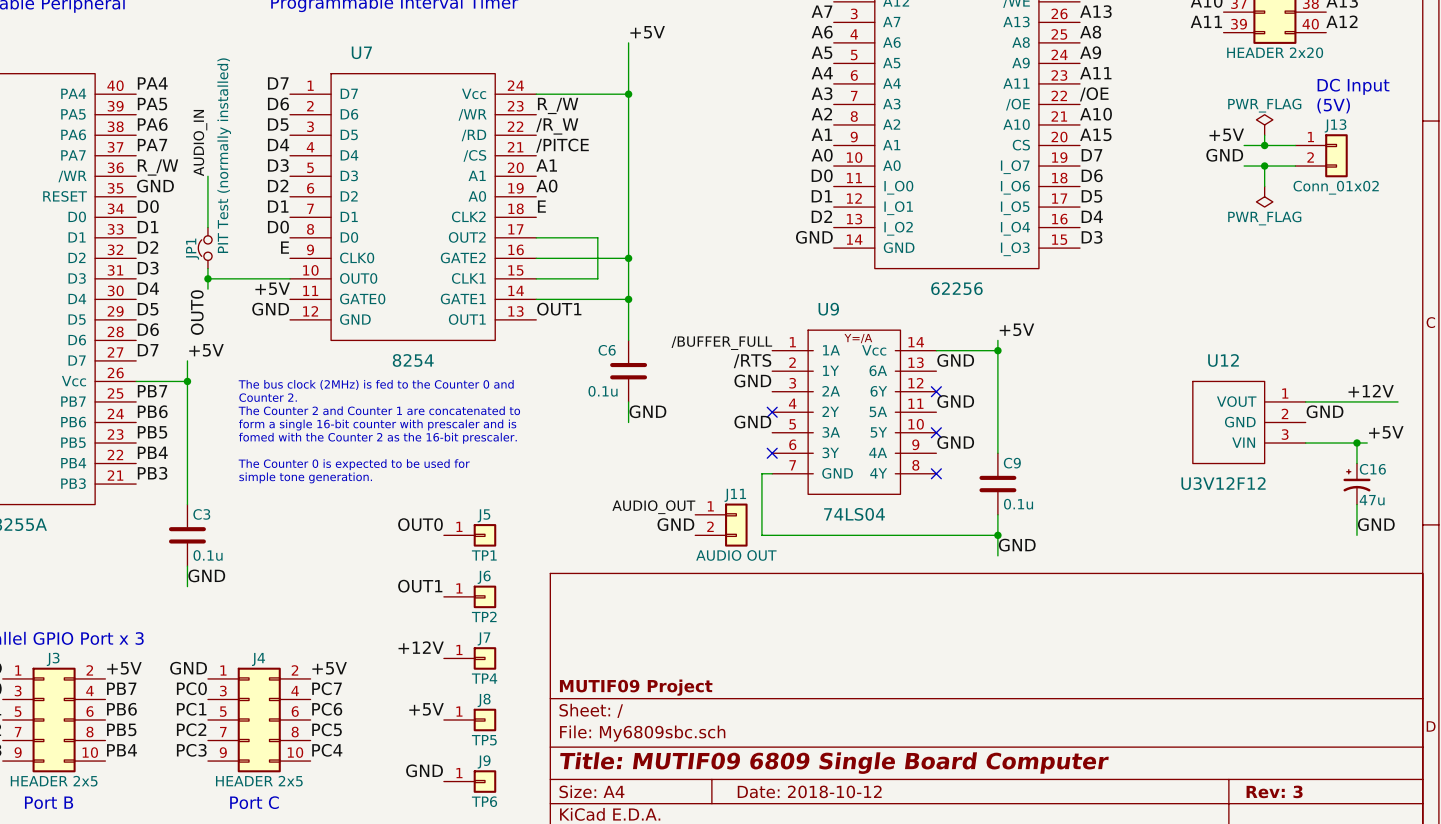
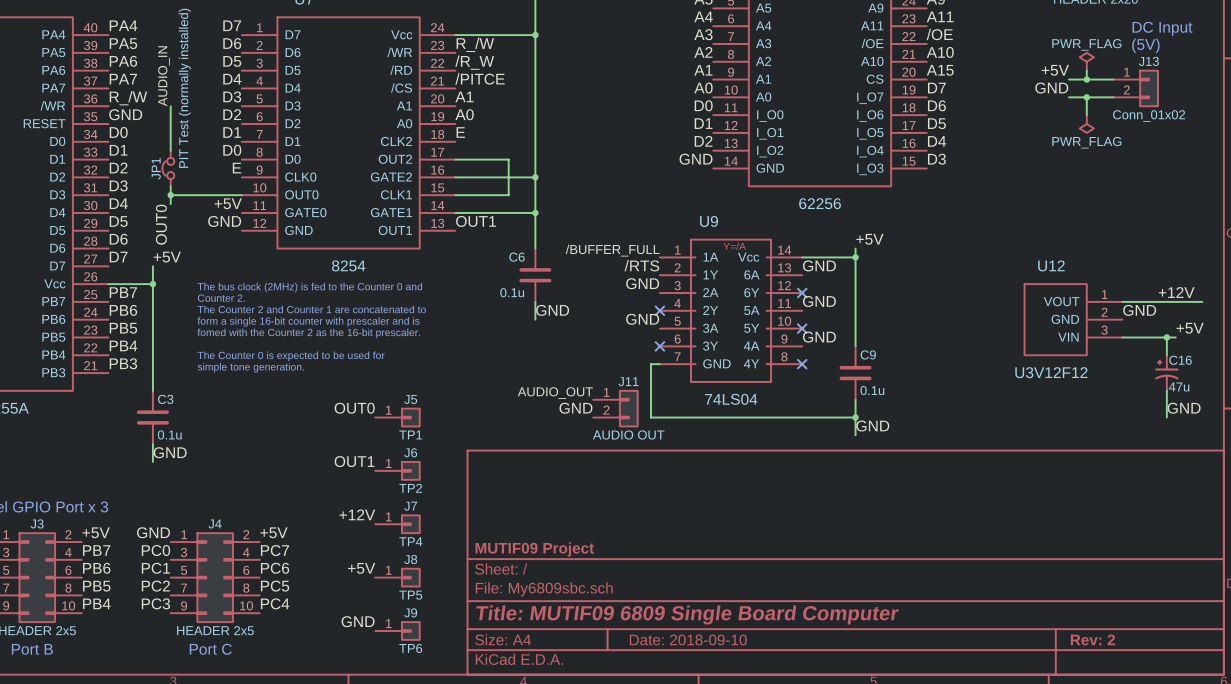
title block: Date: 2018-10-12 (809, 791) -> Date: 2018-09-10 (688, 639)
title block: Rev: 3 (1274, 791) -> Rev: 2 (1092, 639)

